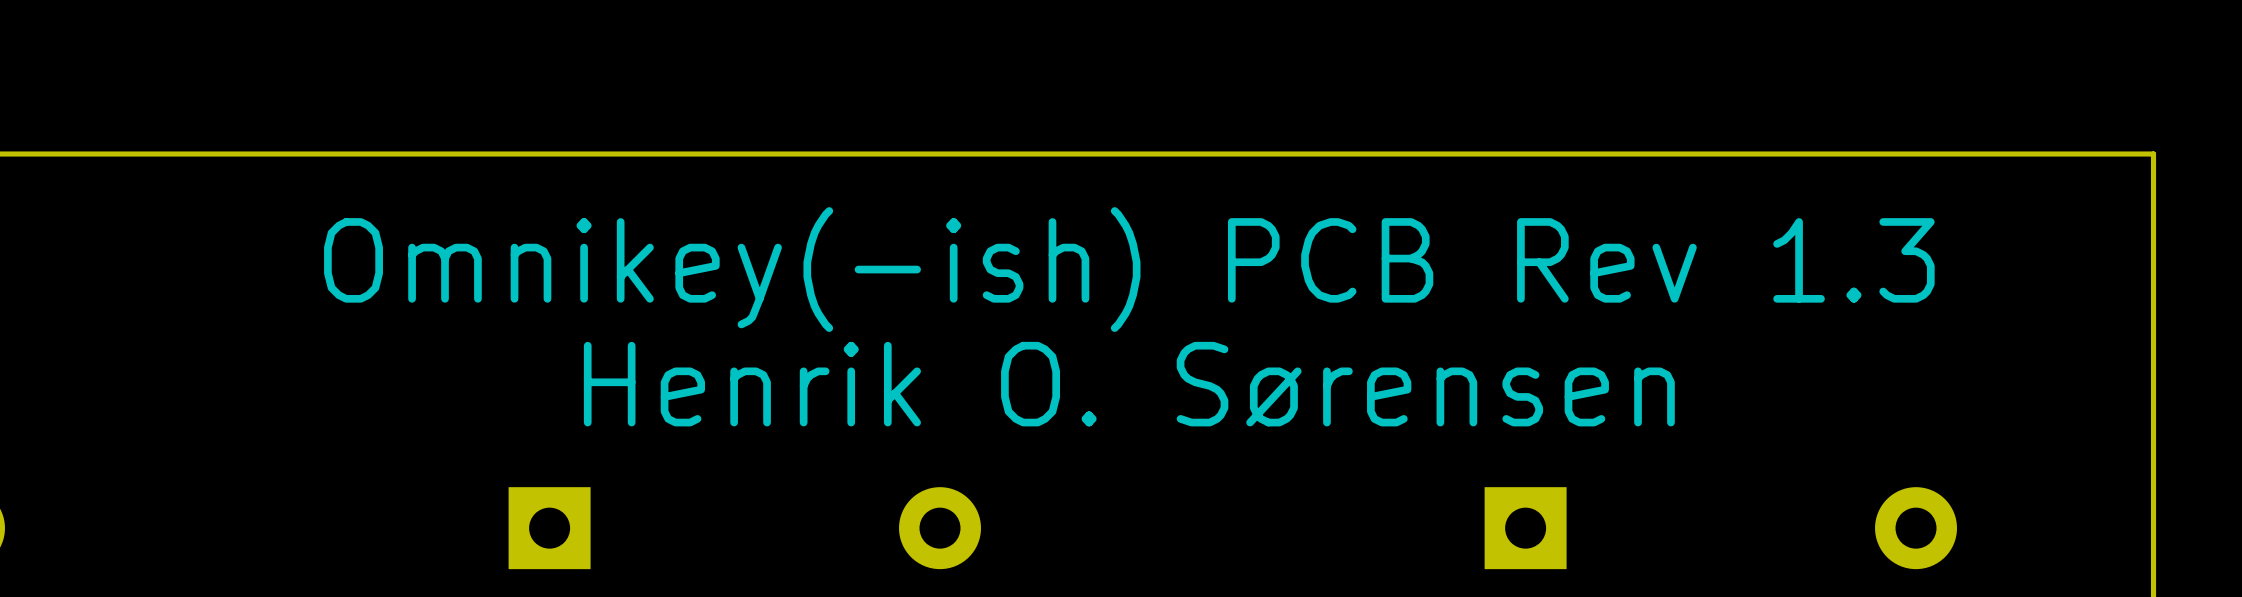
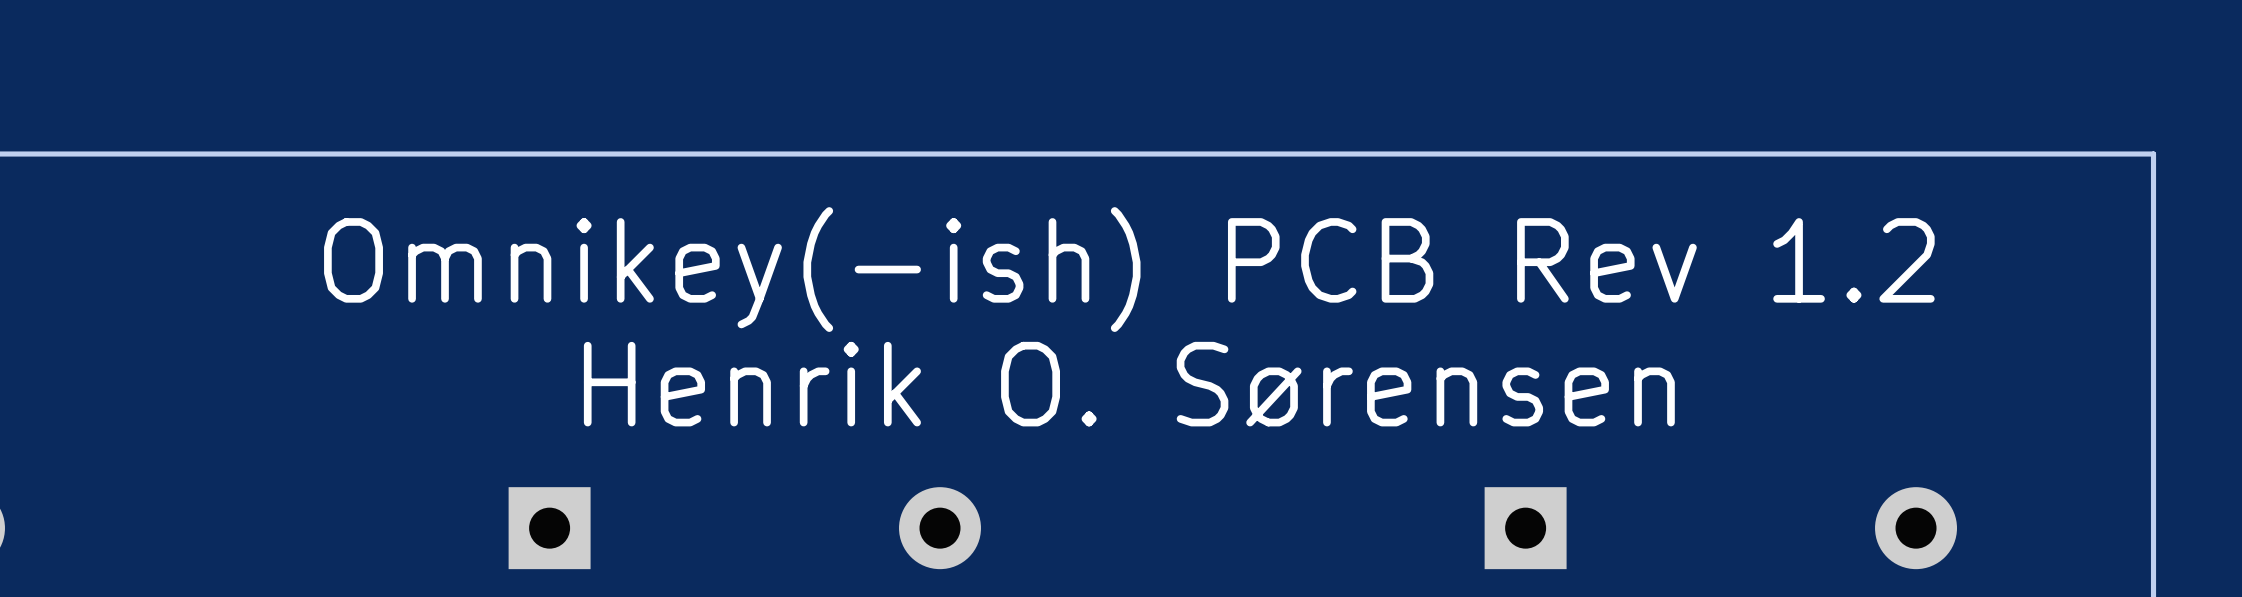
text: Omnikey(-ish) PCB Rev 1.3 (1129, 269) -> Omnikey(-ish) PCB Rev 1.2 (1129, 269)

